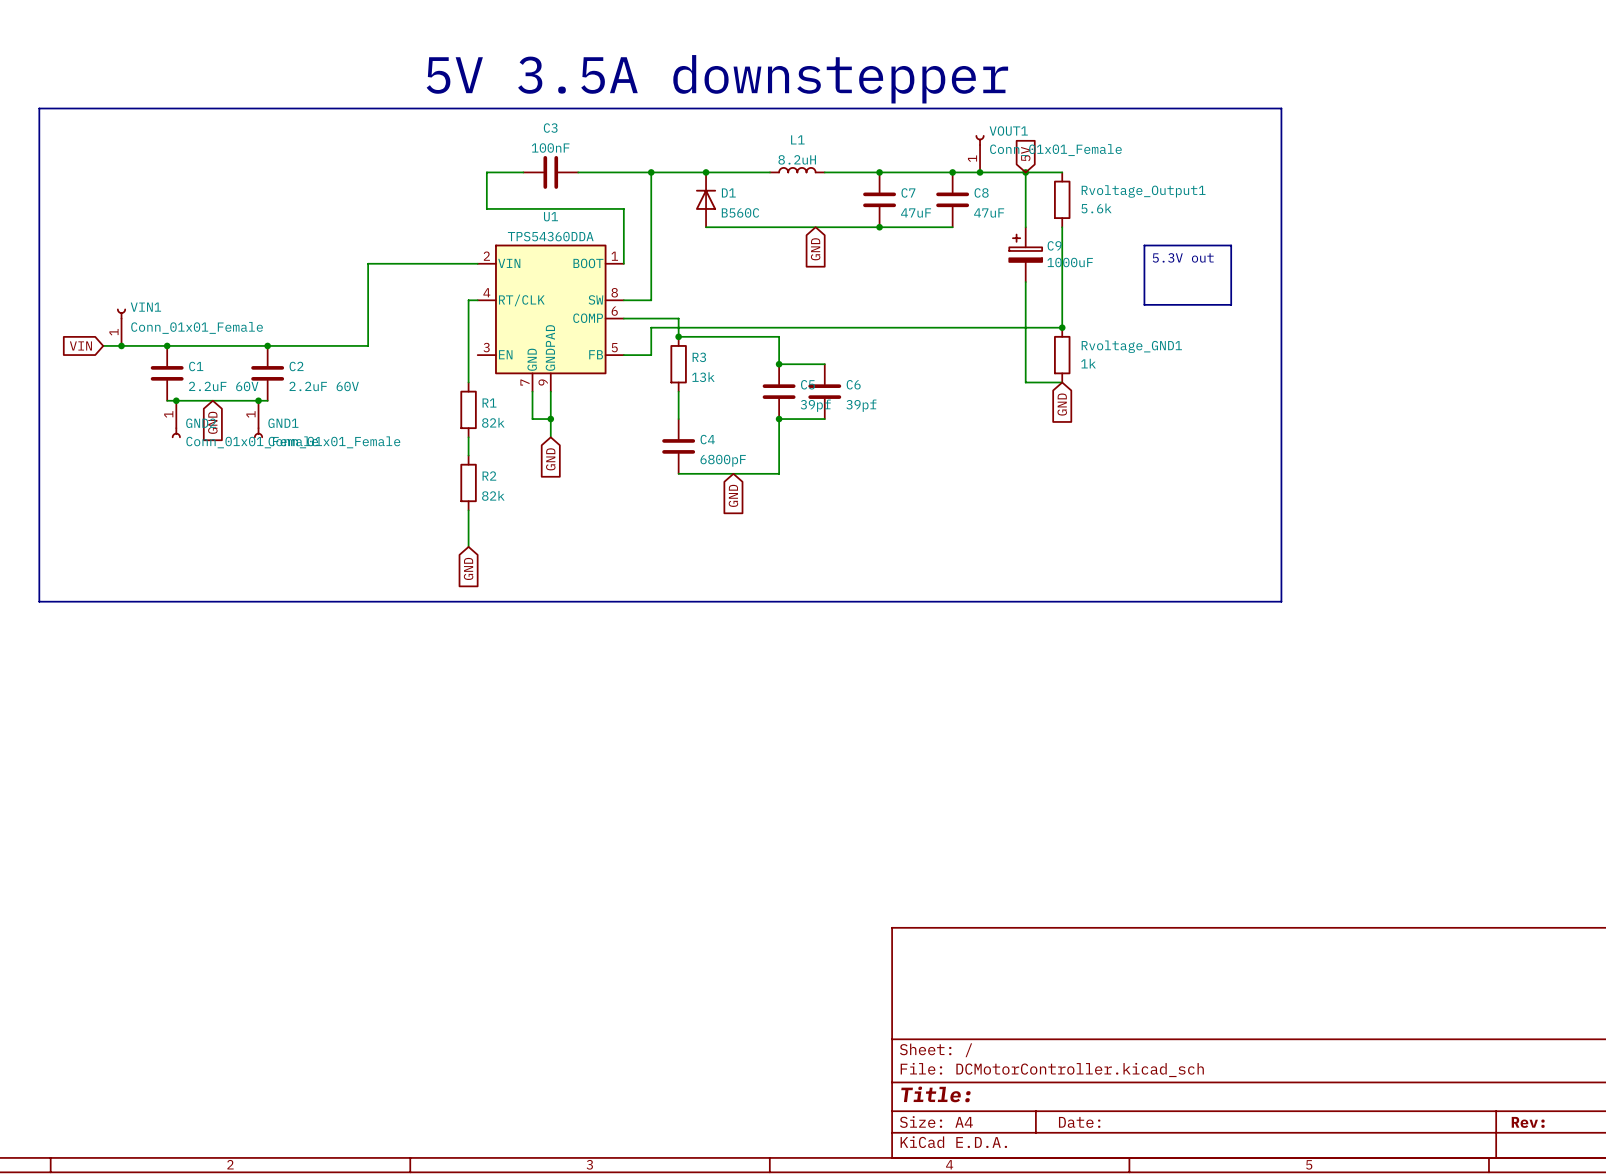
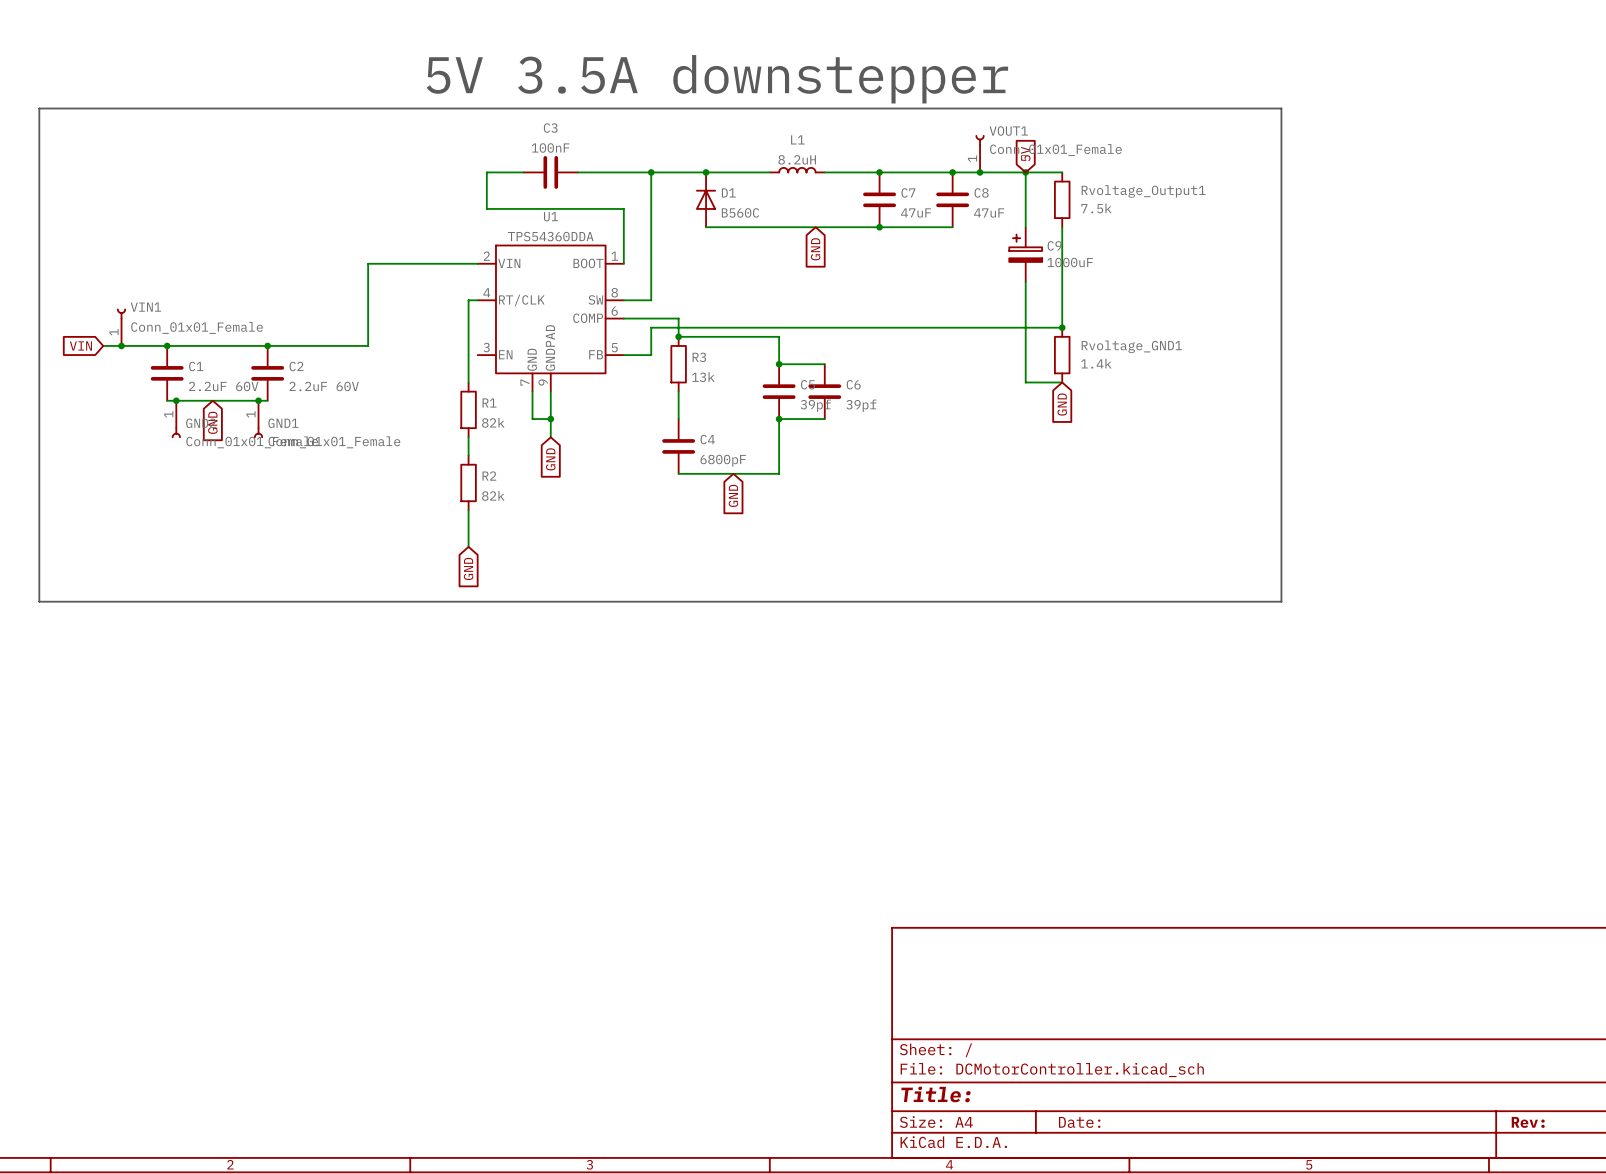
Rvoltage_Output1 value: 5.6k (1096, 208) -> 7.5k (1096, 208)
line: (1144, 245) (1231, 245) (1231, 304) (1144, 304) (1144, 245) -> none
text: 5.3V out (1183, 257) -> none
Rvoltage_GND1 value: 1k (1088, 363) -> 1.4k (1096, 363)

